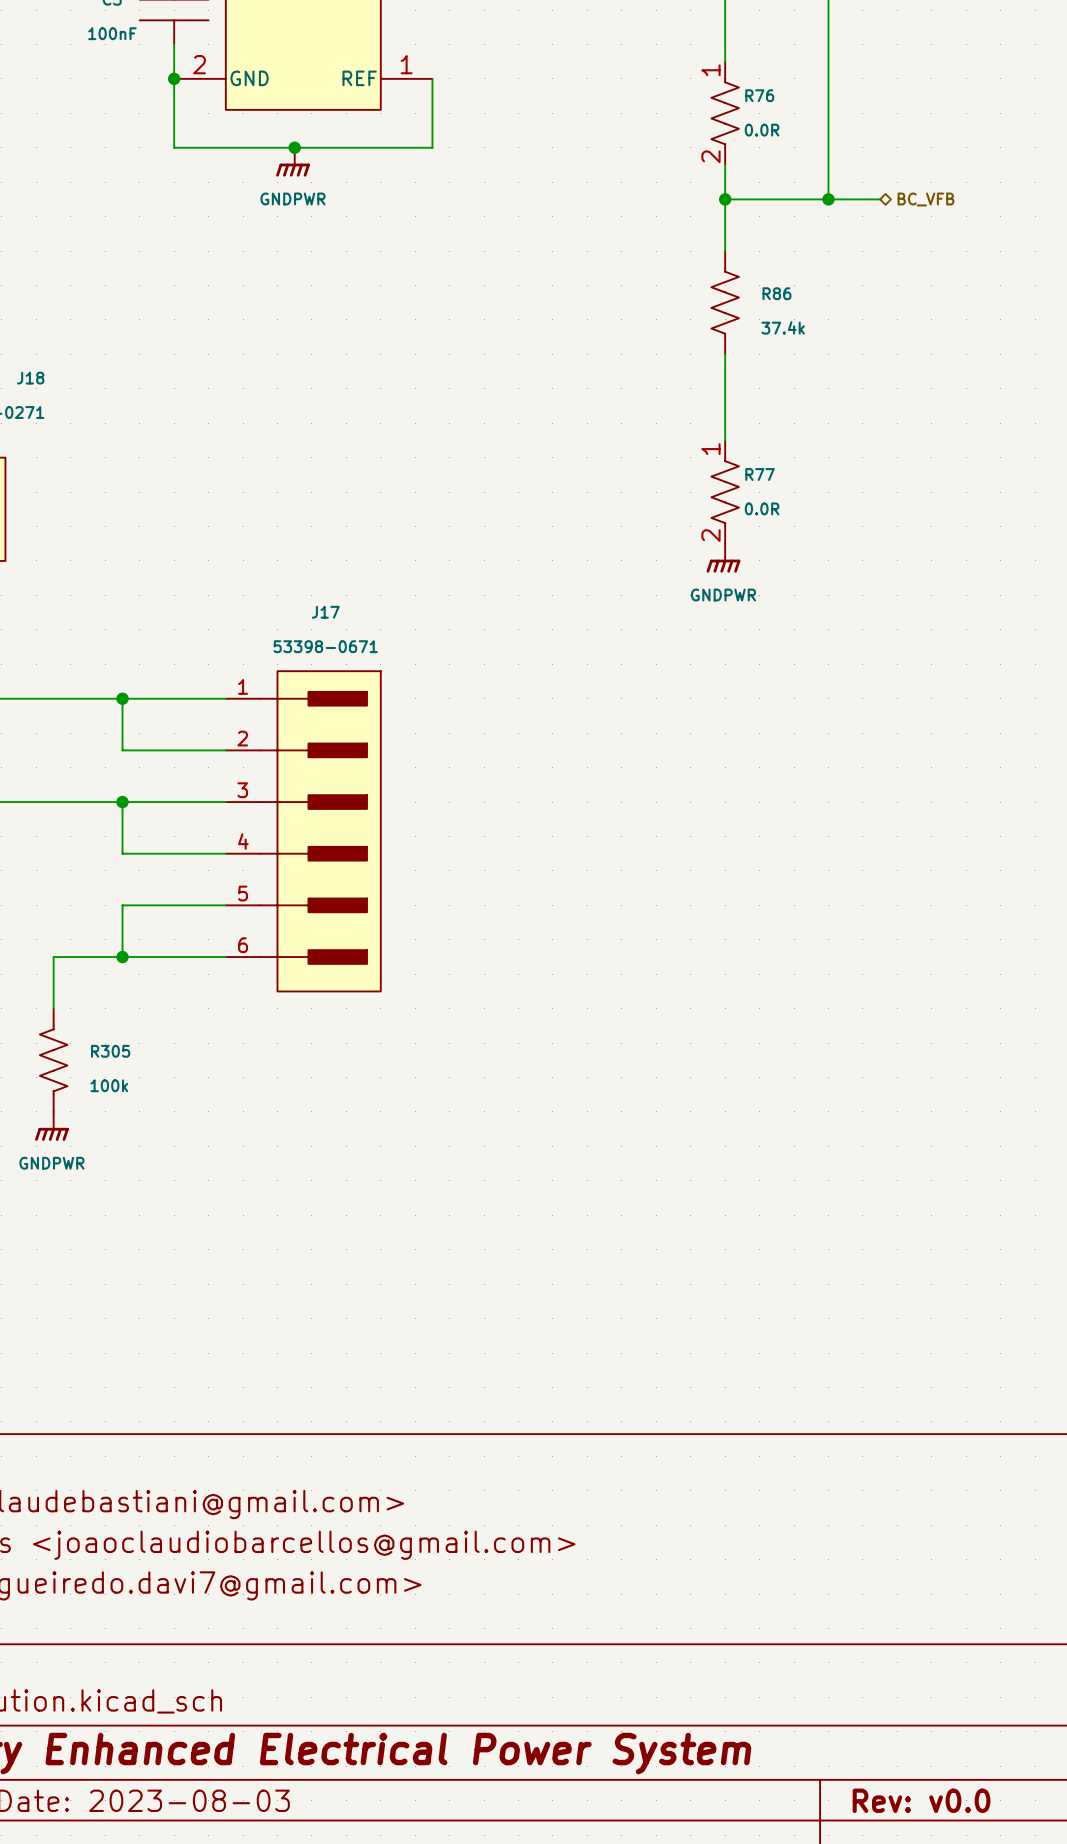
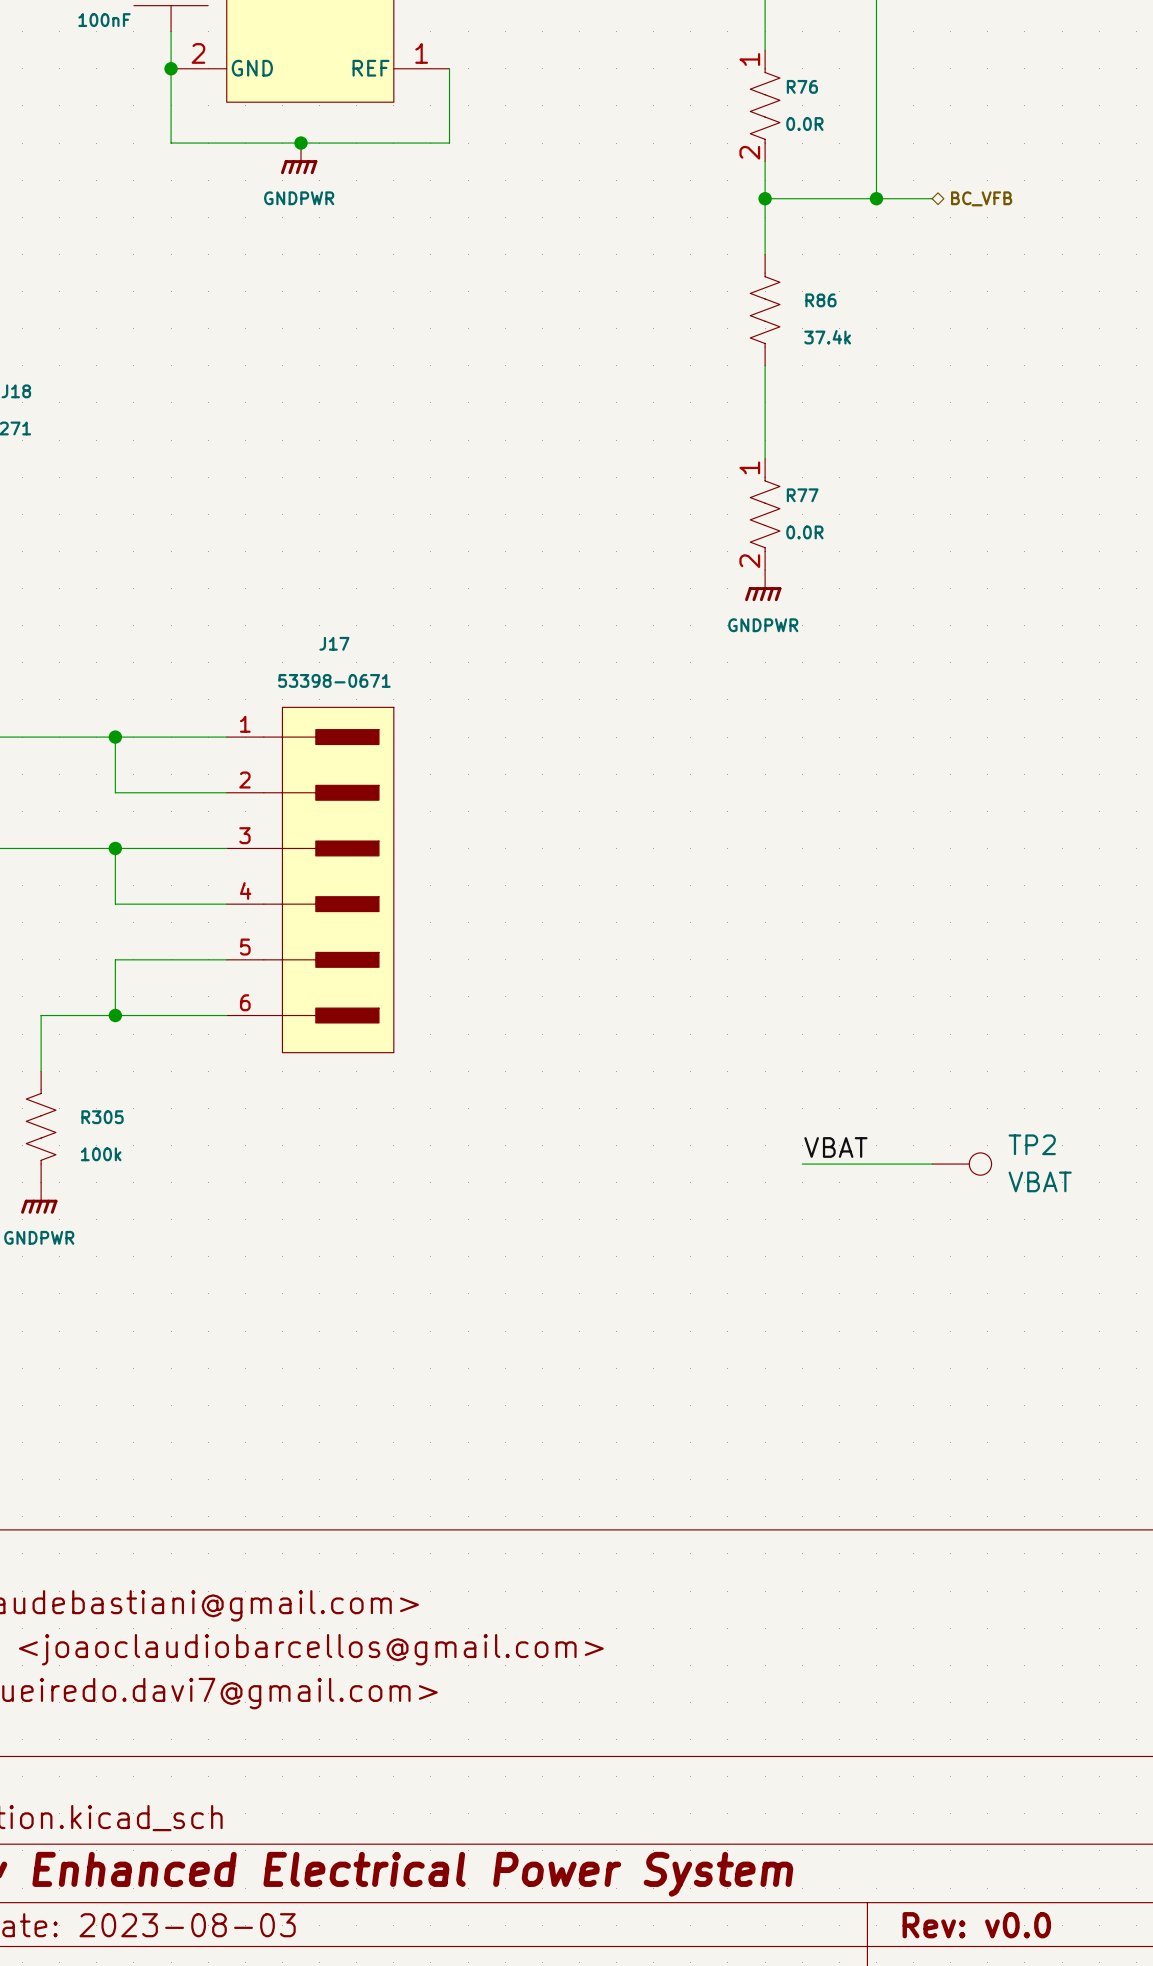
label: none -> VBAT (835, 1147)
wire: none -> (802, 1164) (932, 1164)
TP2: none -> VBAT (961, 1164)

